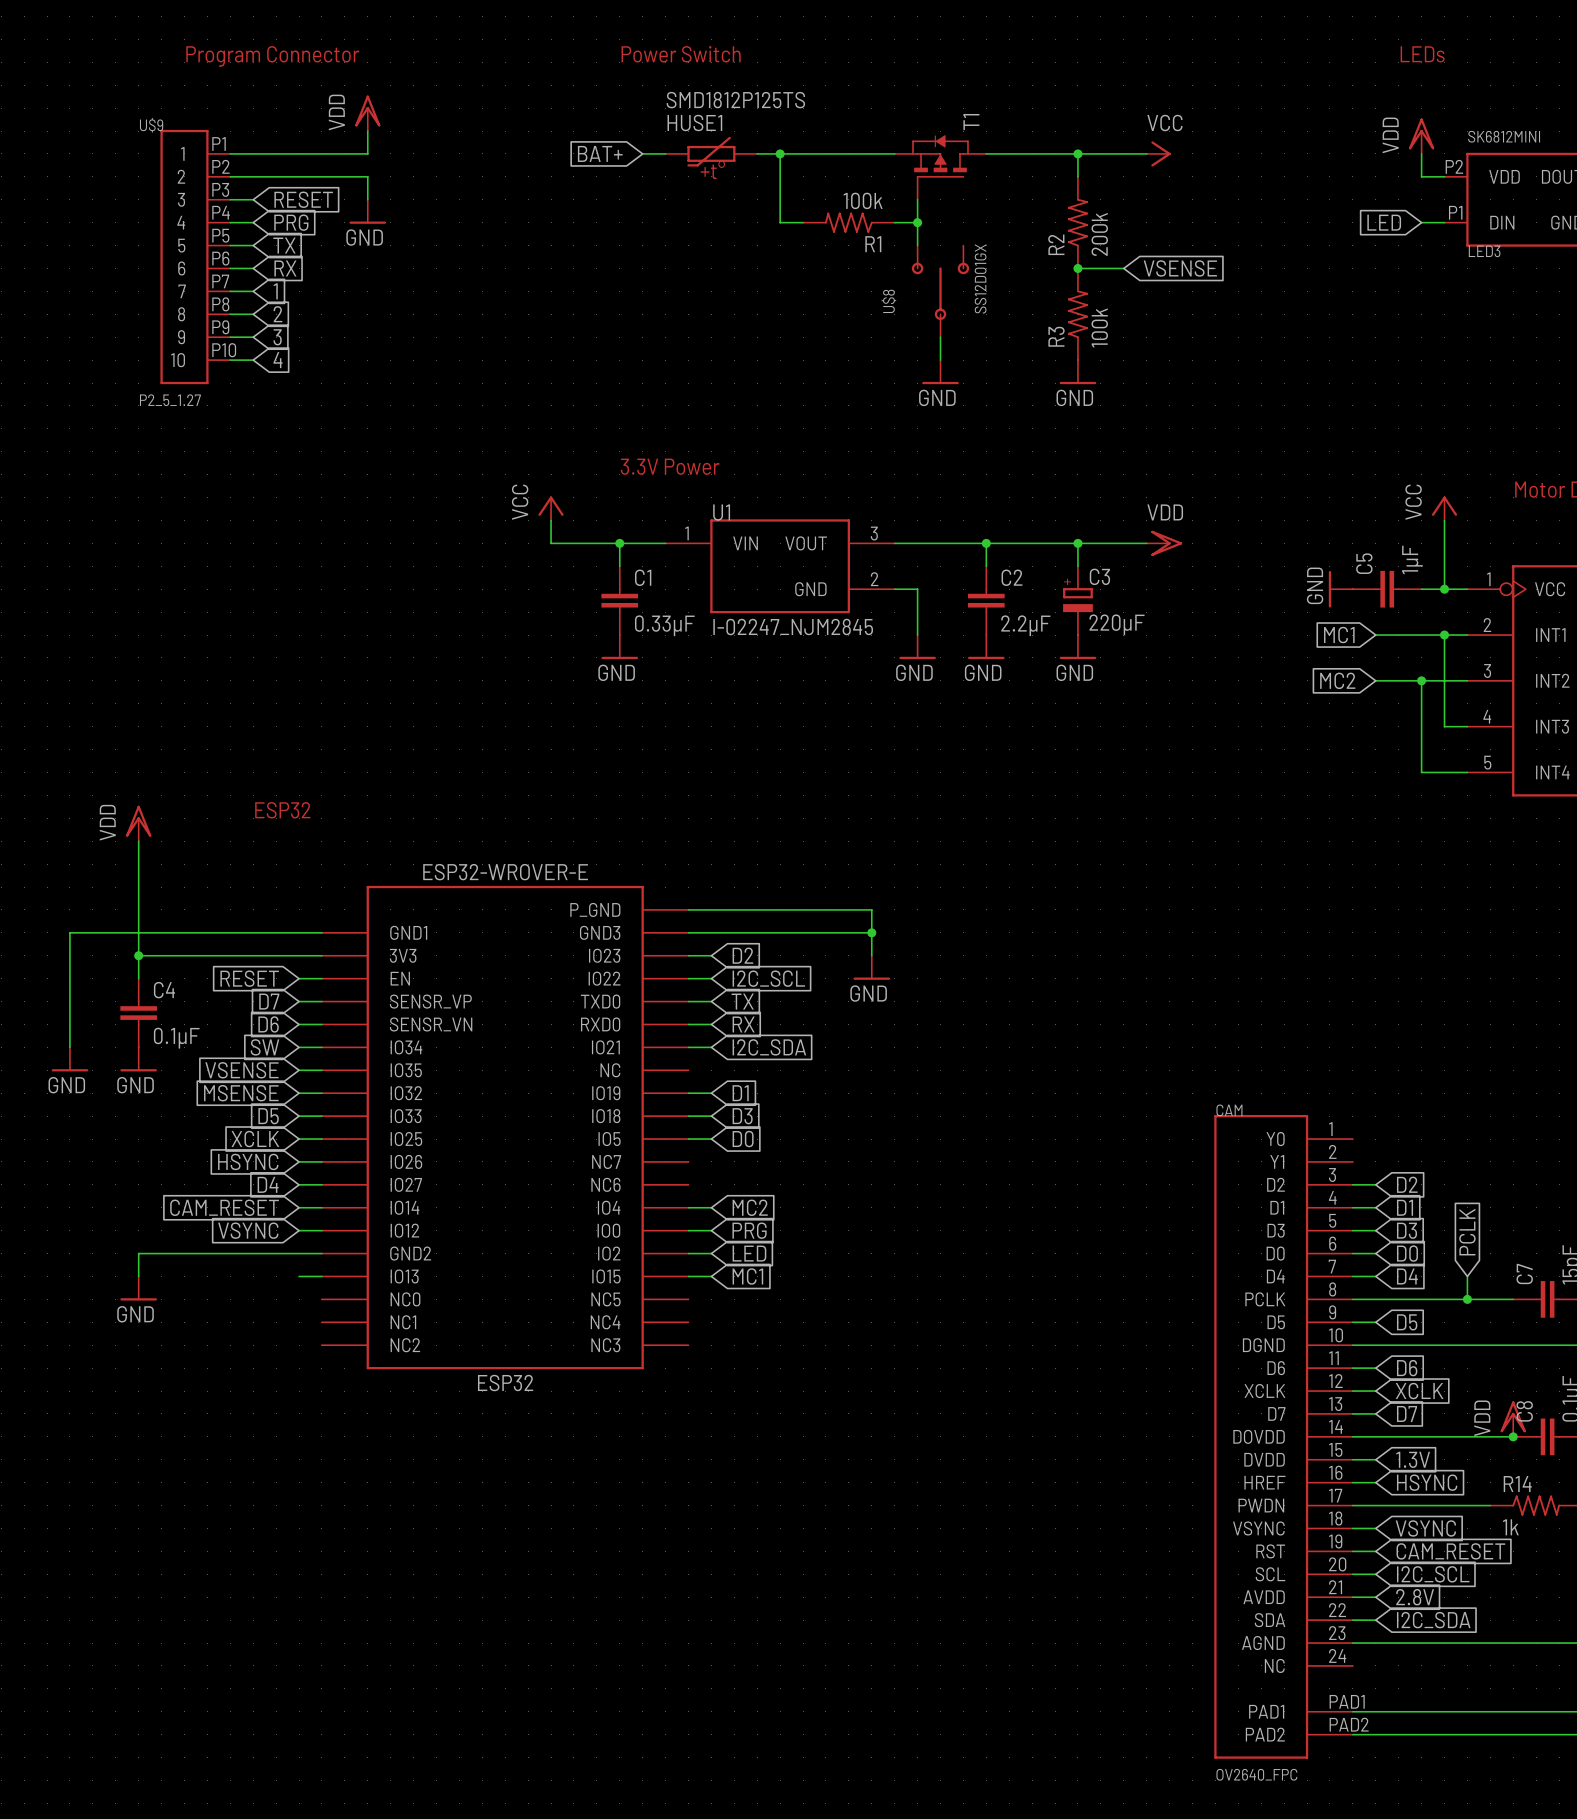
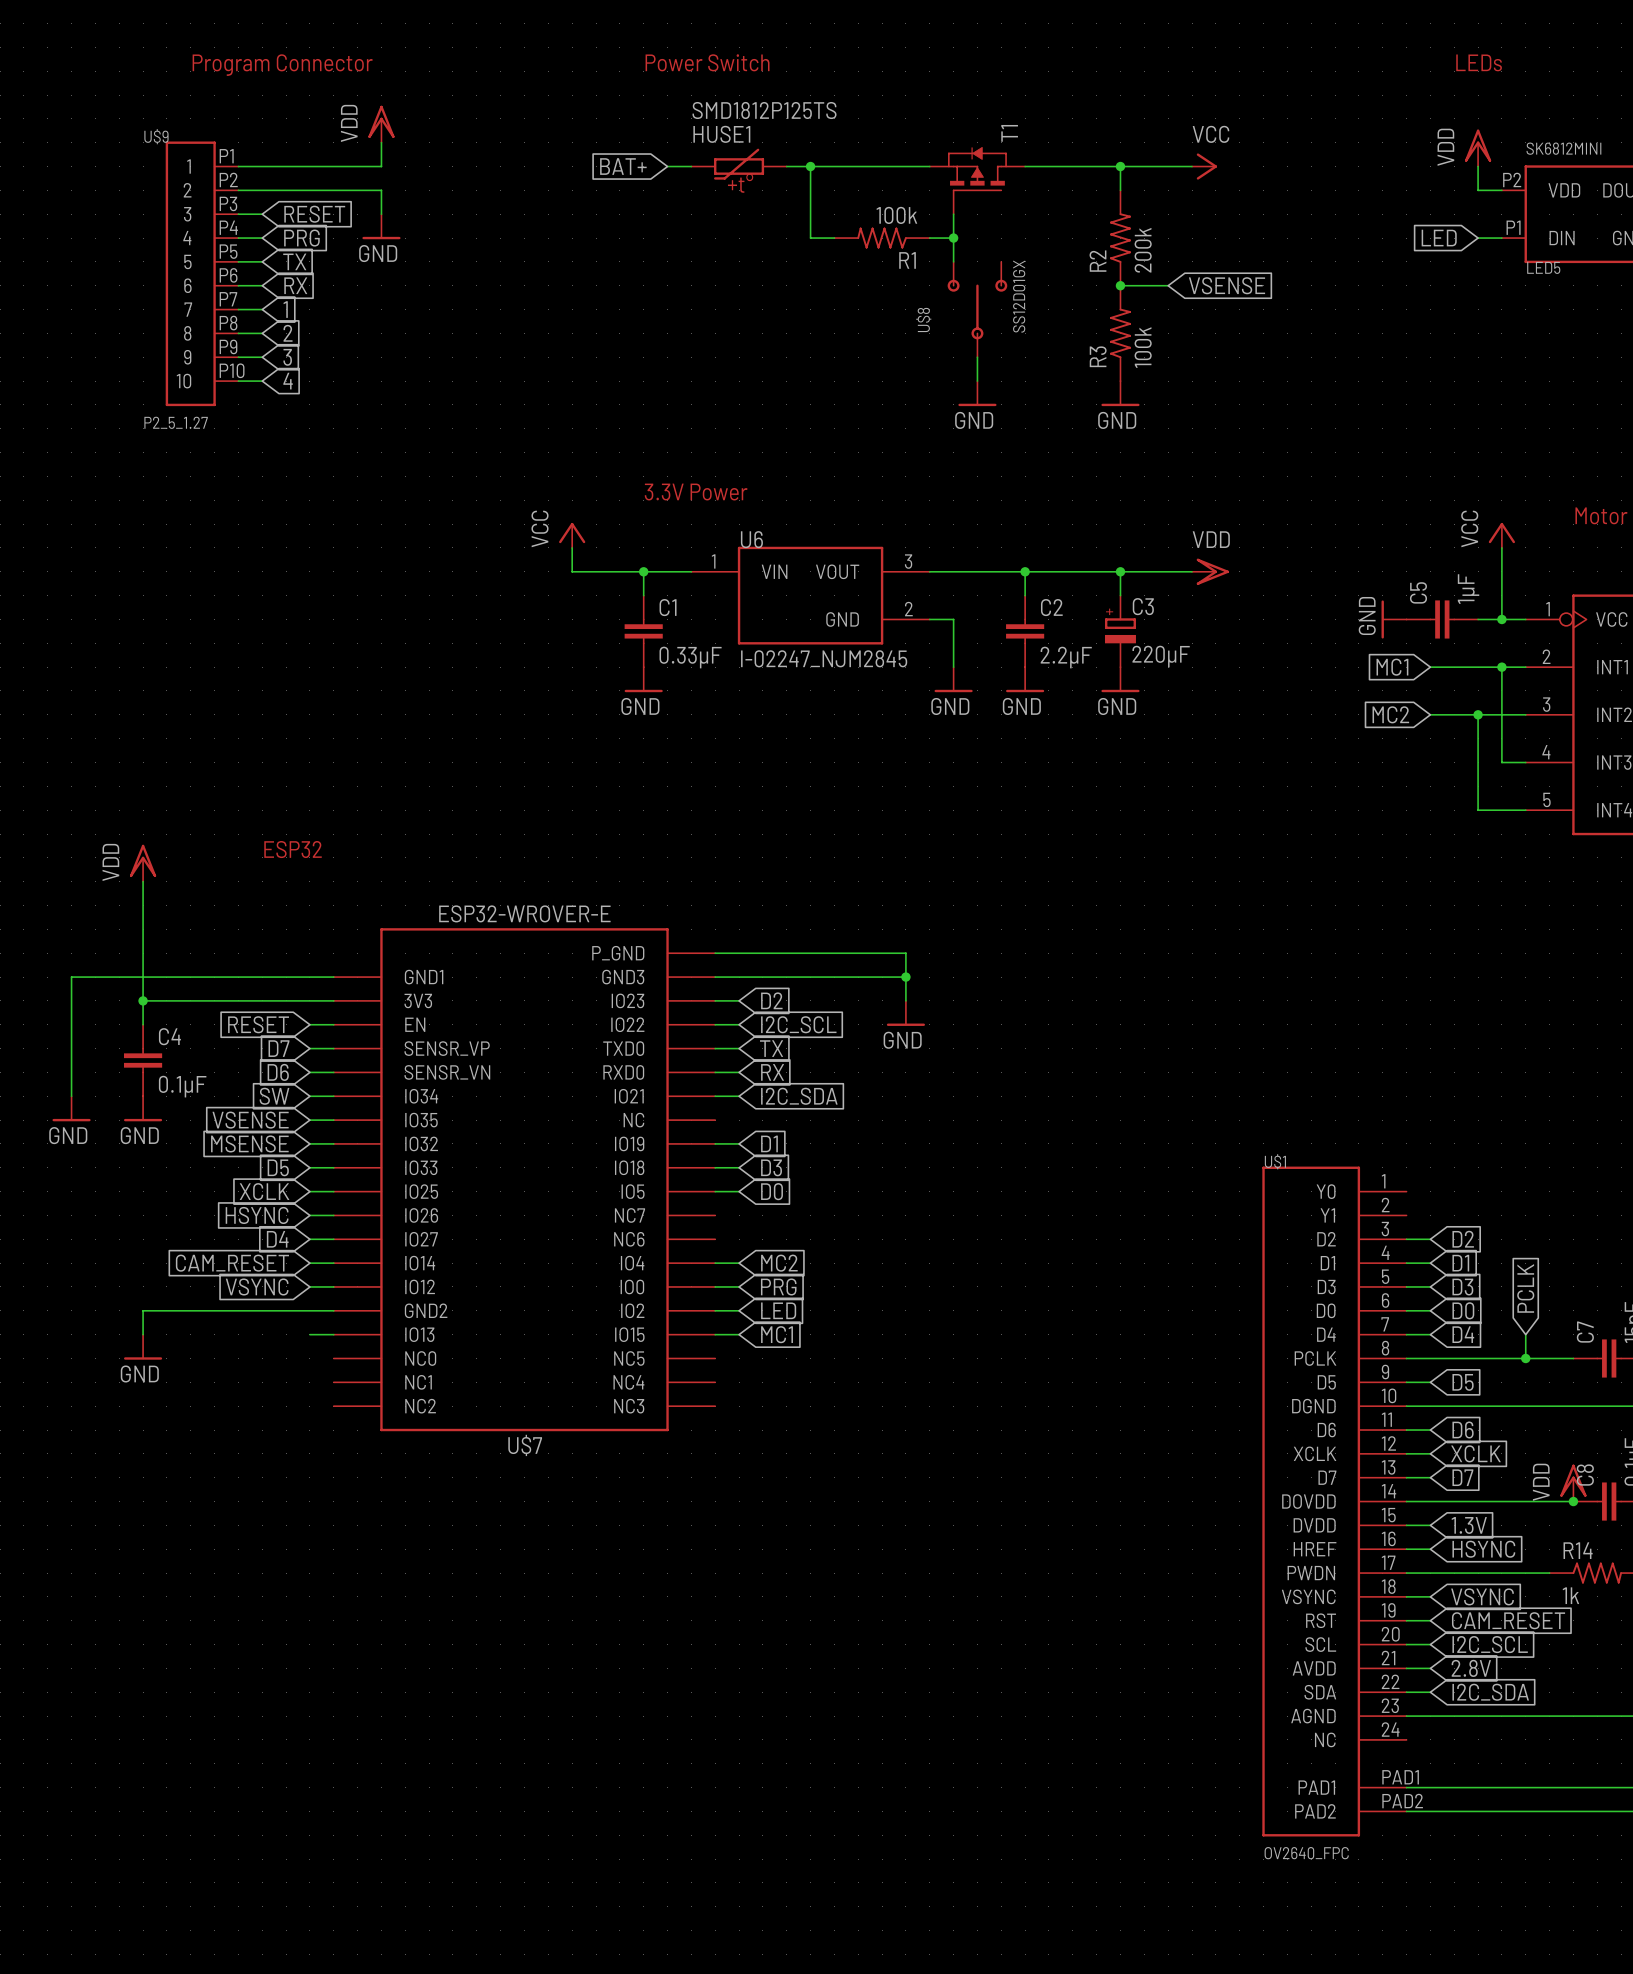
LED3 name: LED3 (1484, 251) -> LED5 (1543, 267)
U1 name: U1 (721, 512) -> U6 (751, 539)
CAM name: CAM (1229, 1110) -> U$1 (1275, 1161)
ESP32 name: ESP32 (505, 1383) -> U$7 (525, 1445)

